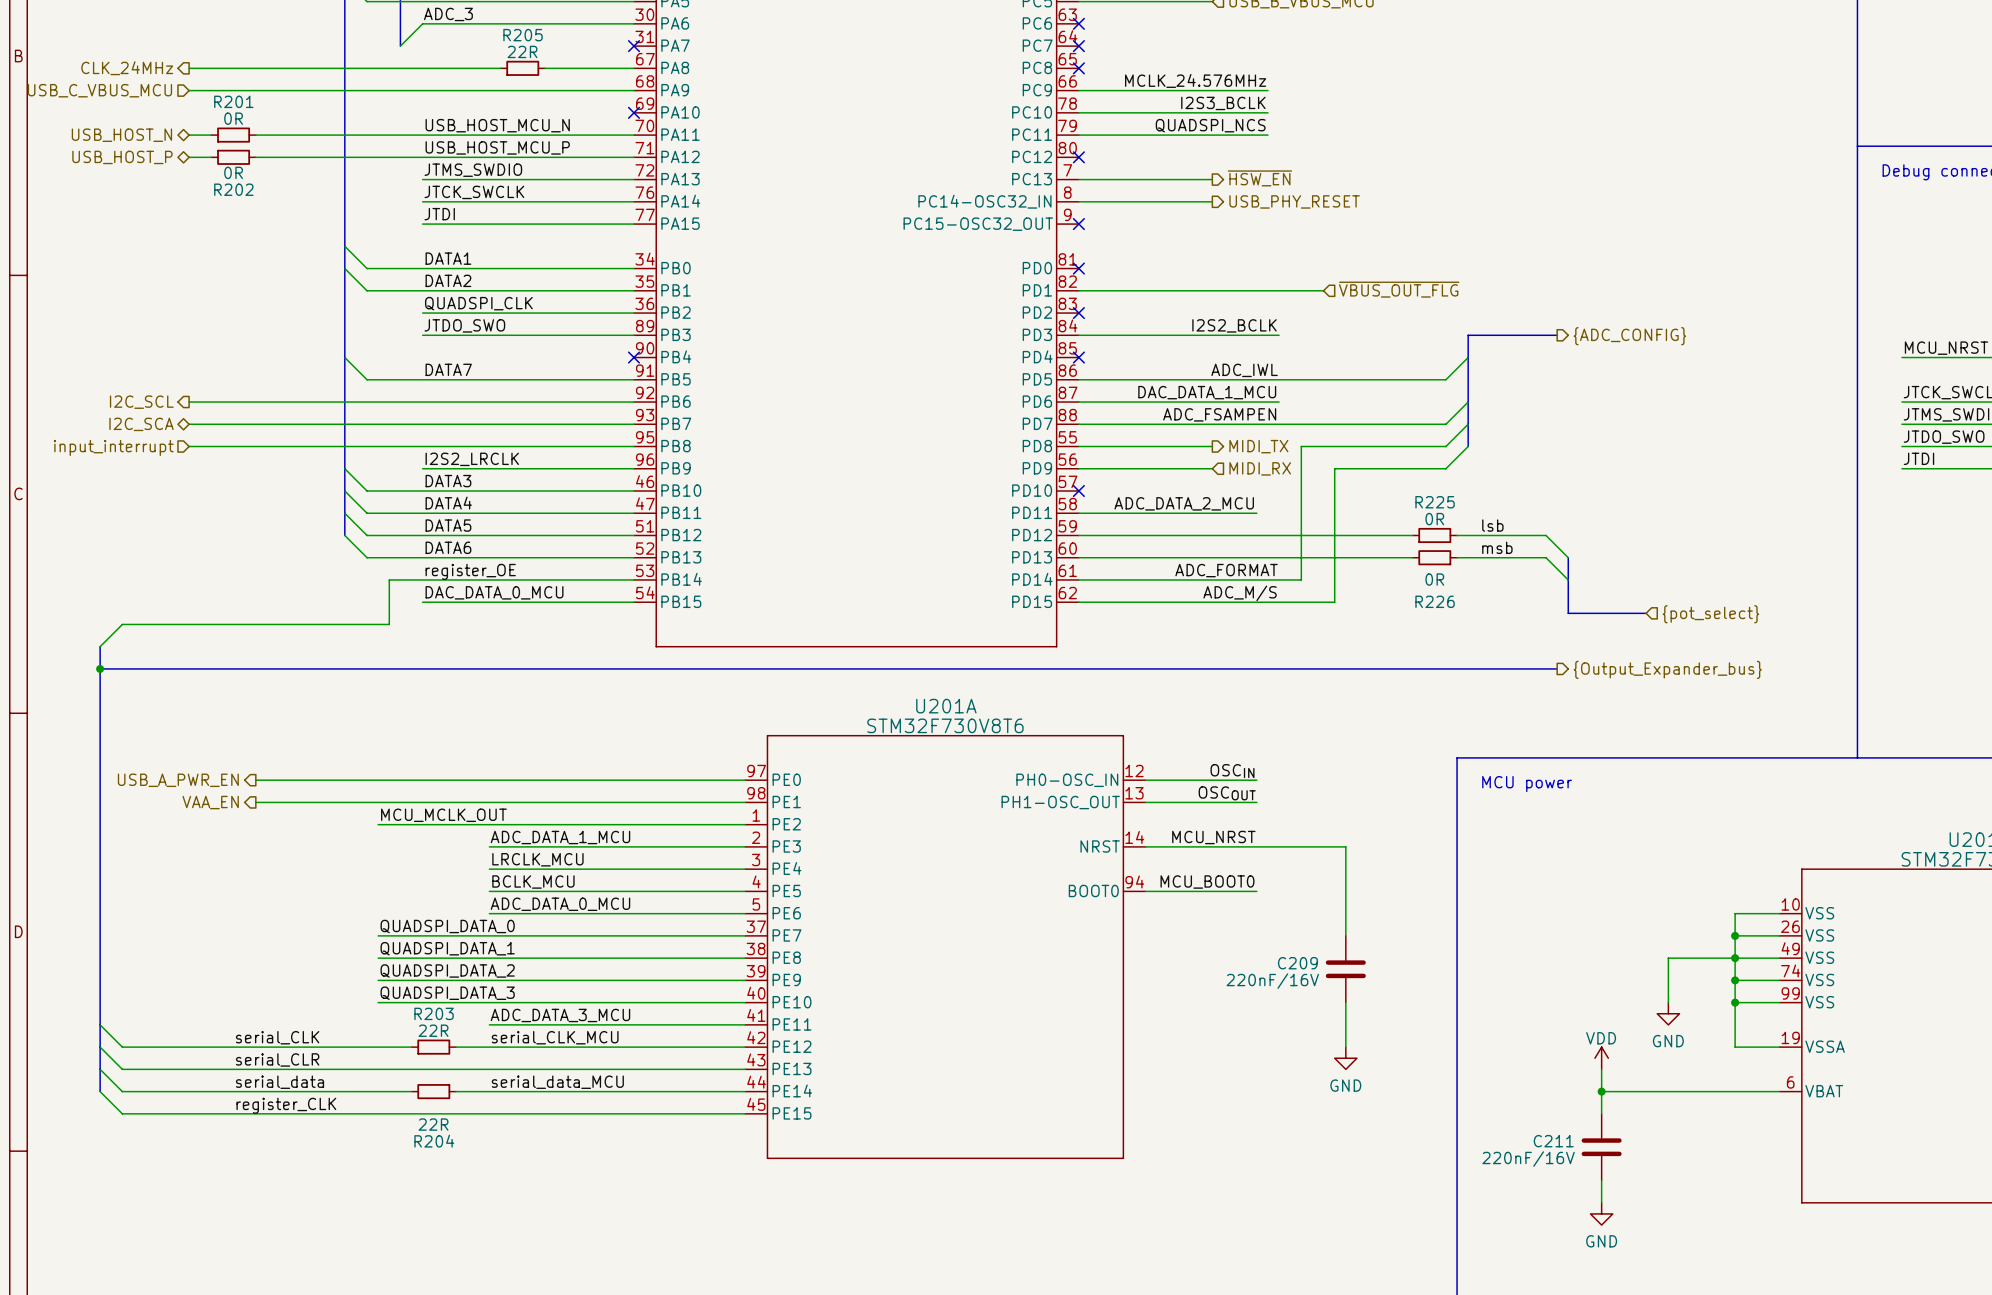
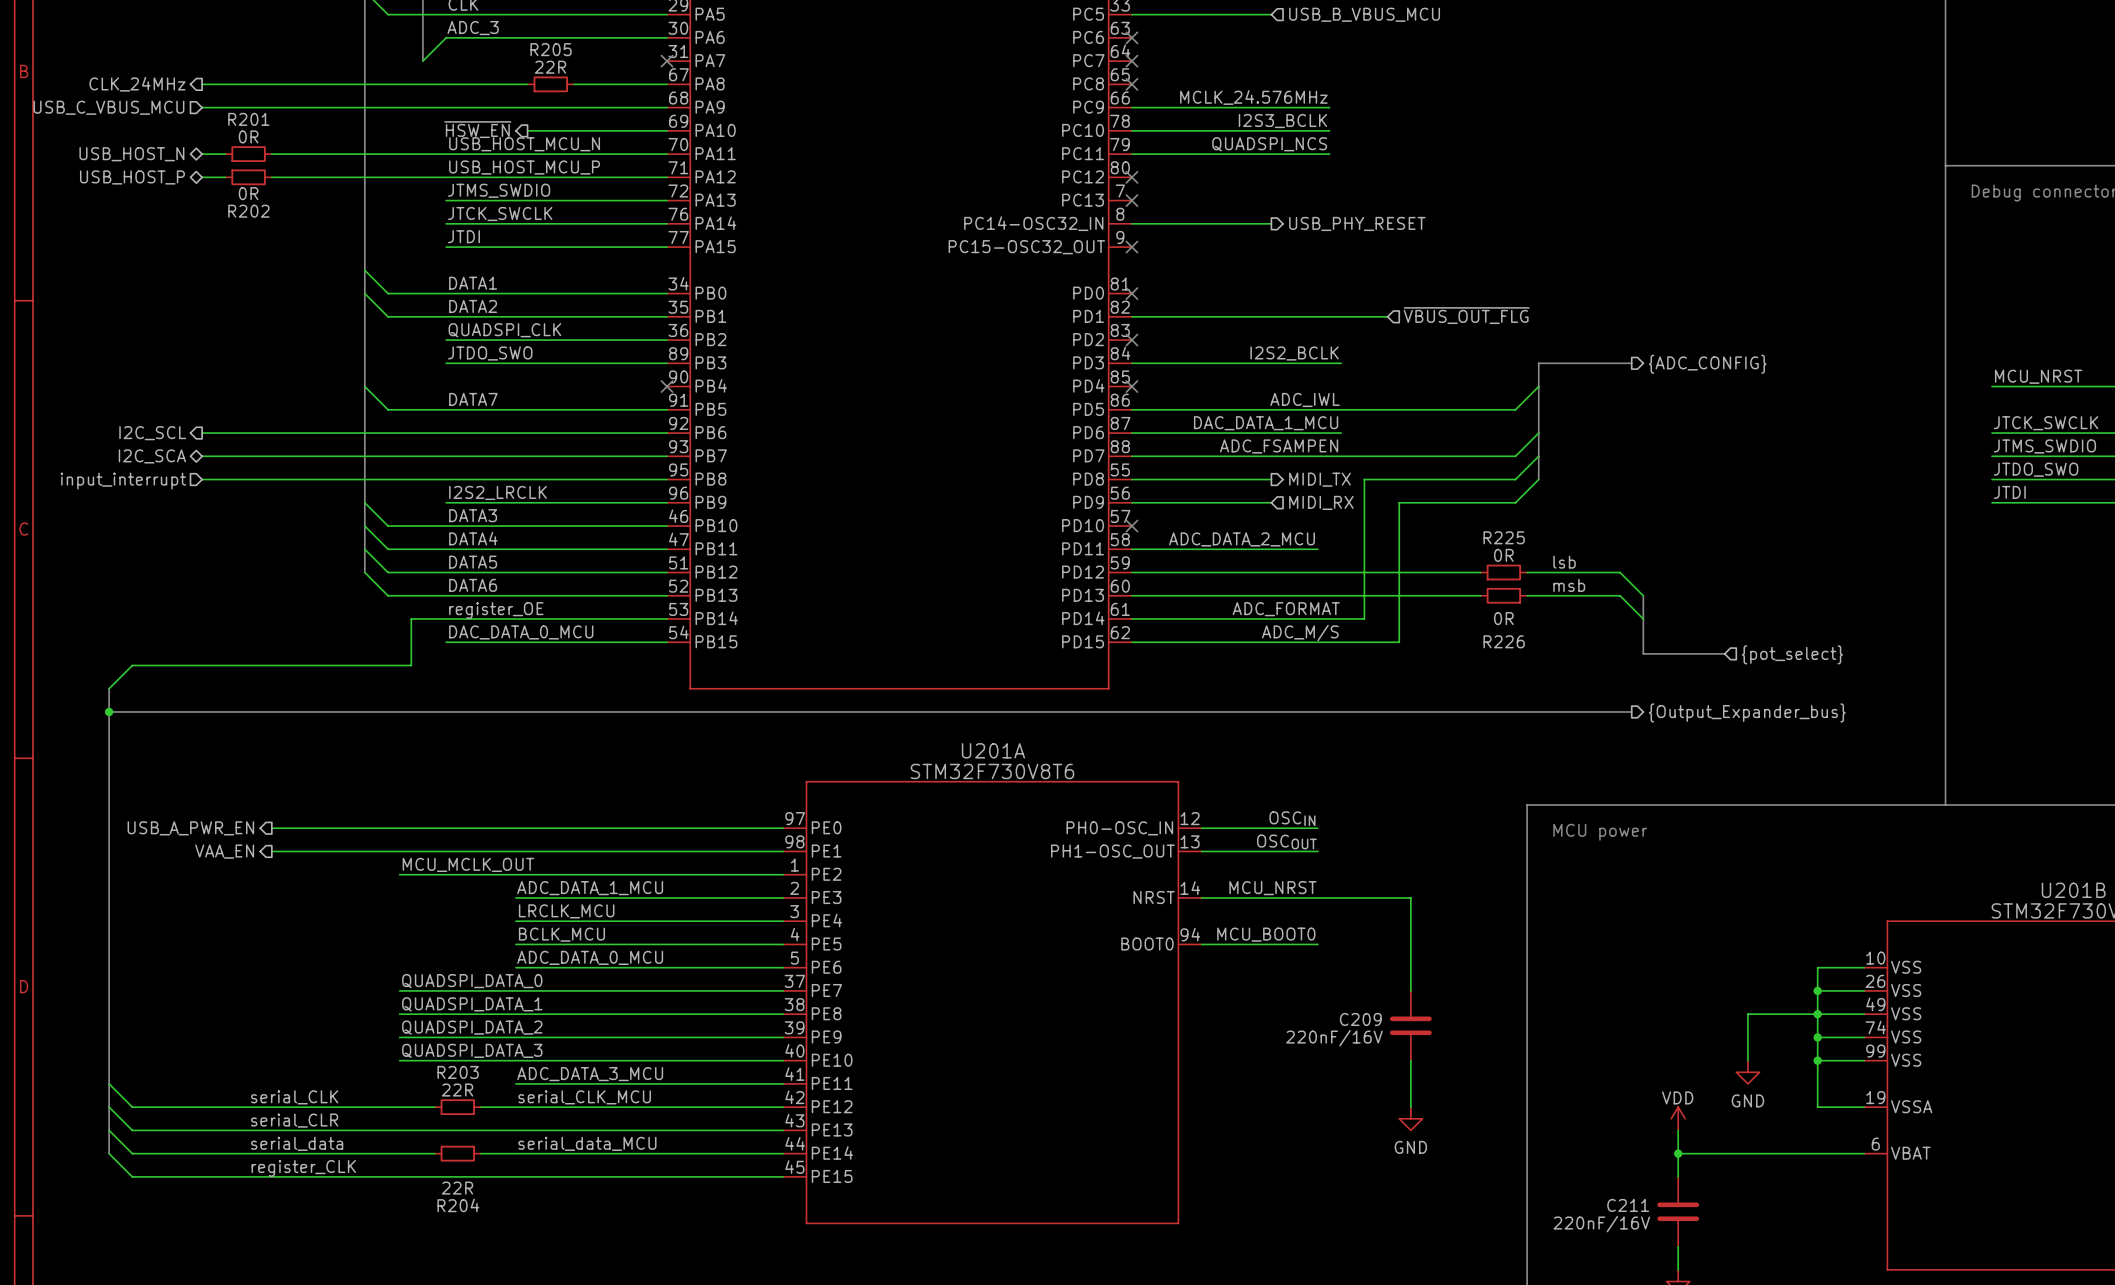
hierarchical label: none -> ~{HSW_EN} (477, 129)
wire: none -> (527, 130) (667, 130)
no-connect mark: (633, 112) -> none
hierarchical label: ~{HSW_EN} (1259, 178) -> none
wire: (1078, 179) (1212, 179) -> none
no-connect mark: none -> (1131, 200)

